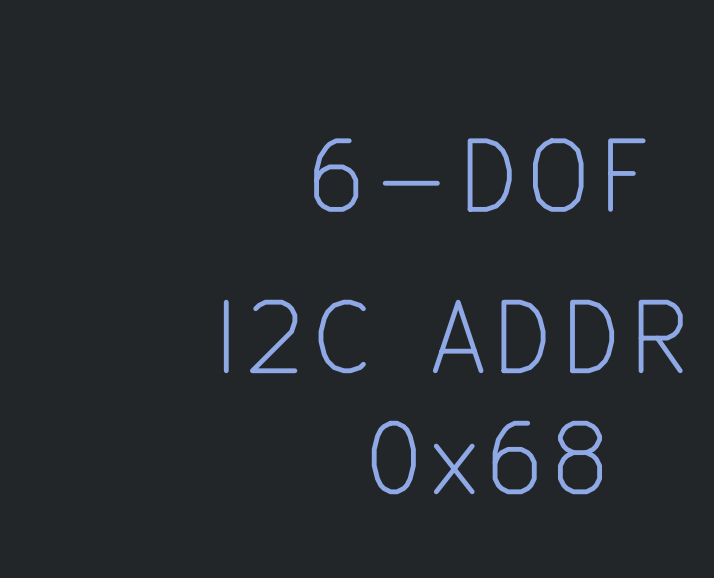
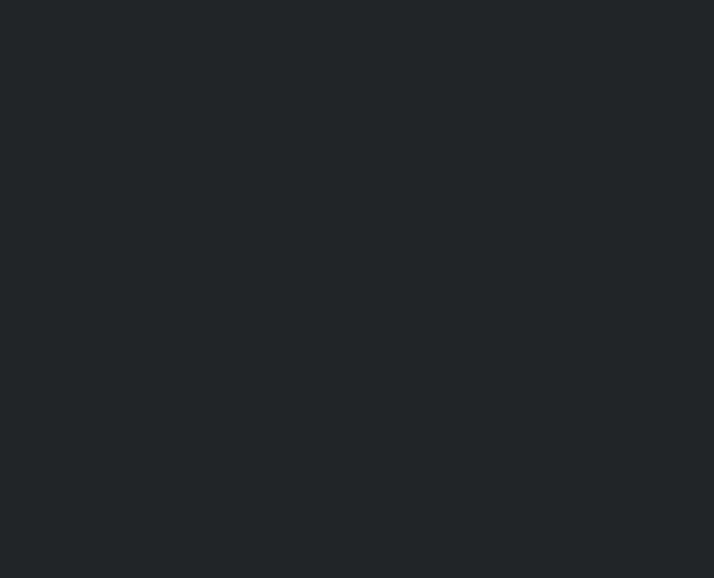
text: 6-DOF (479, 175) -> none
text: I2C ADDR (453, 336) -> none
text: 0x68 (486, 457) -> none

